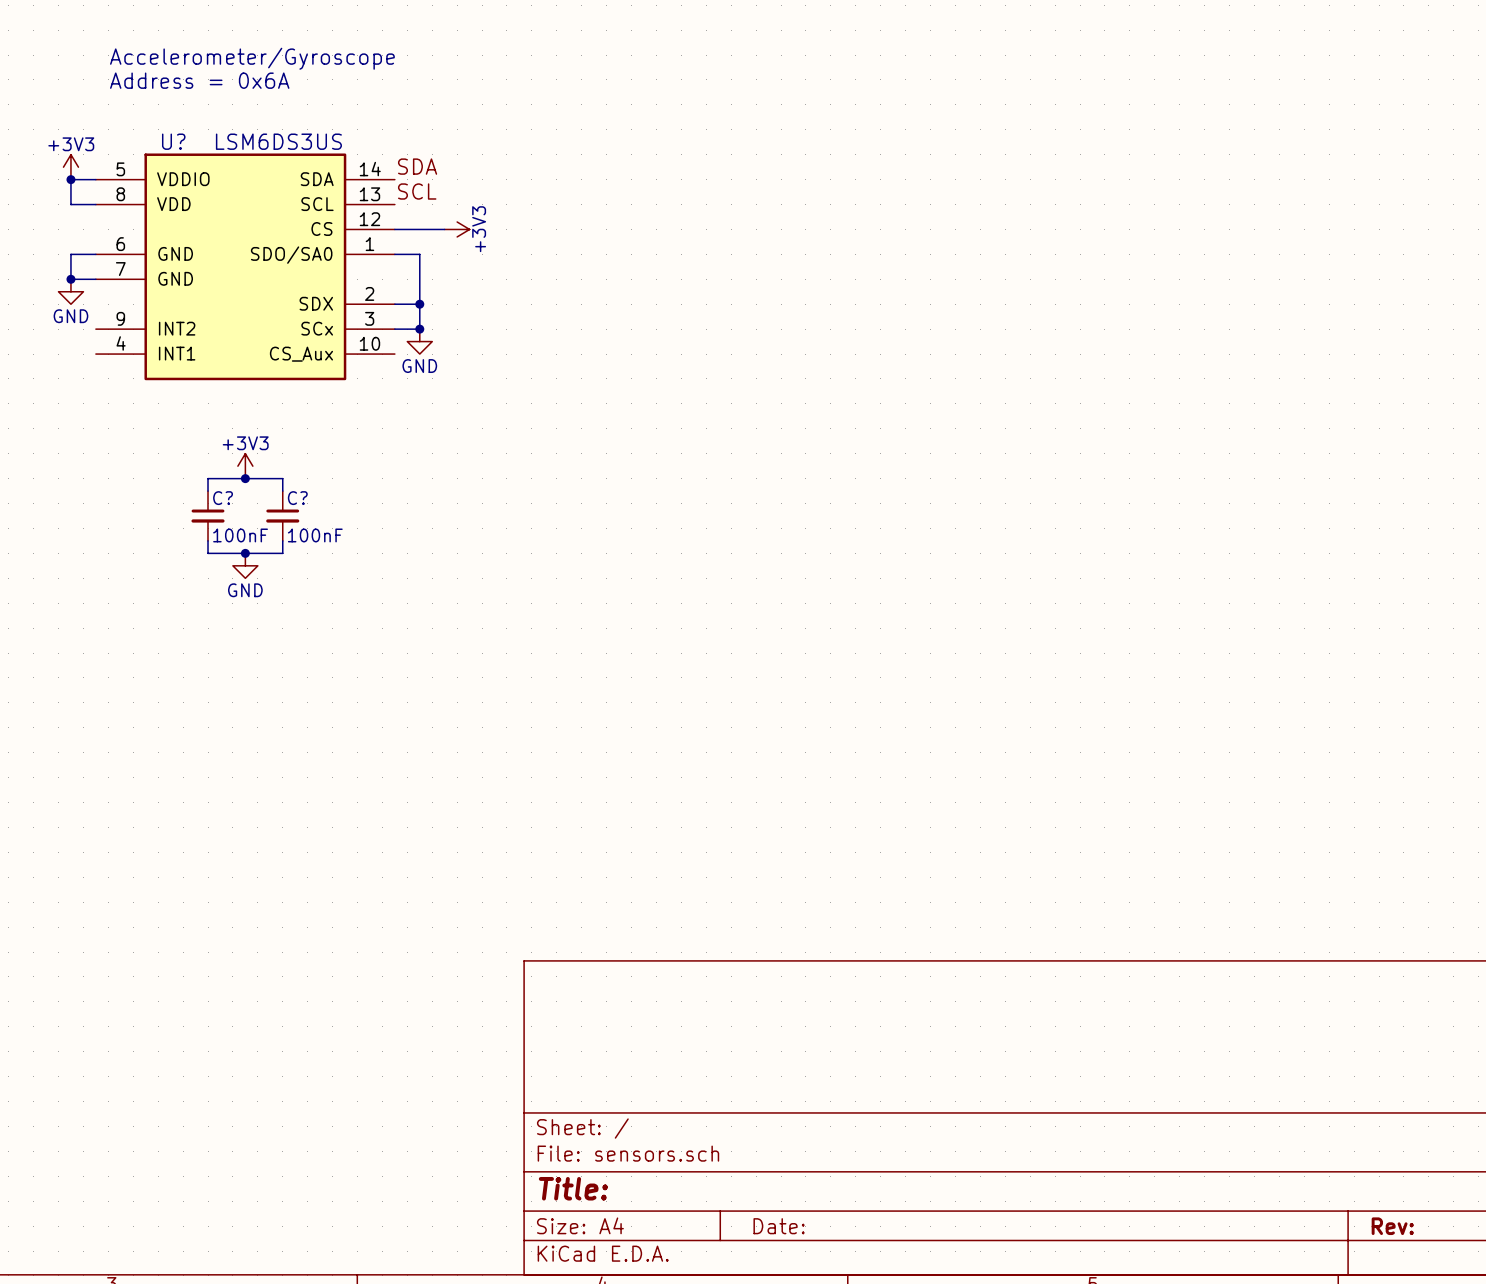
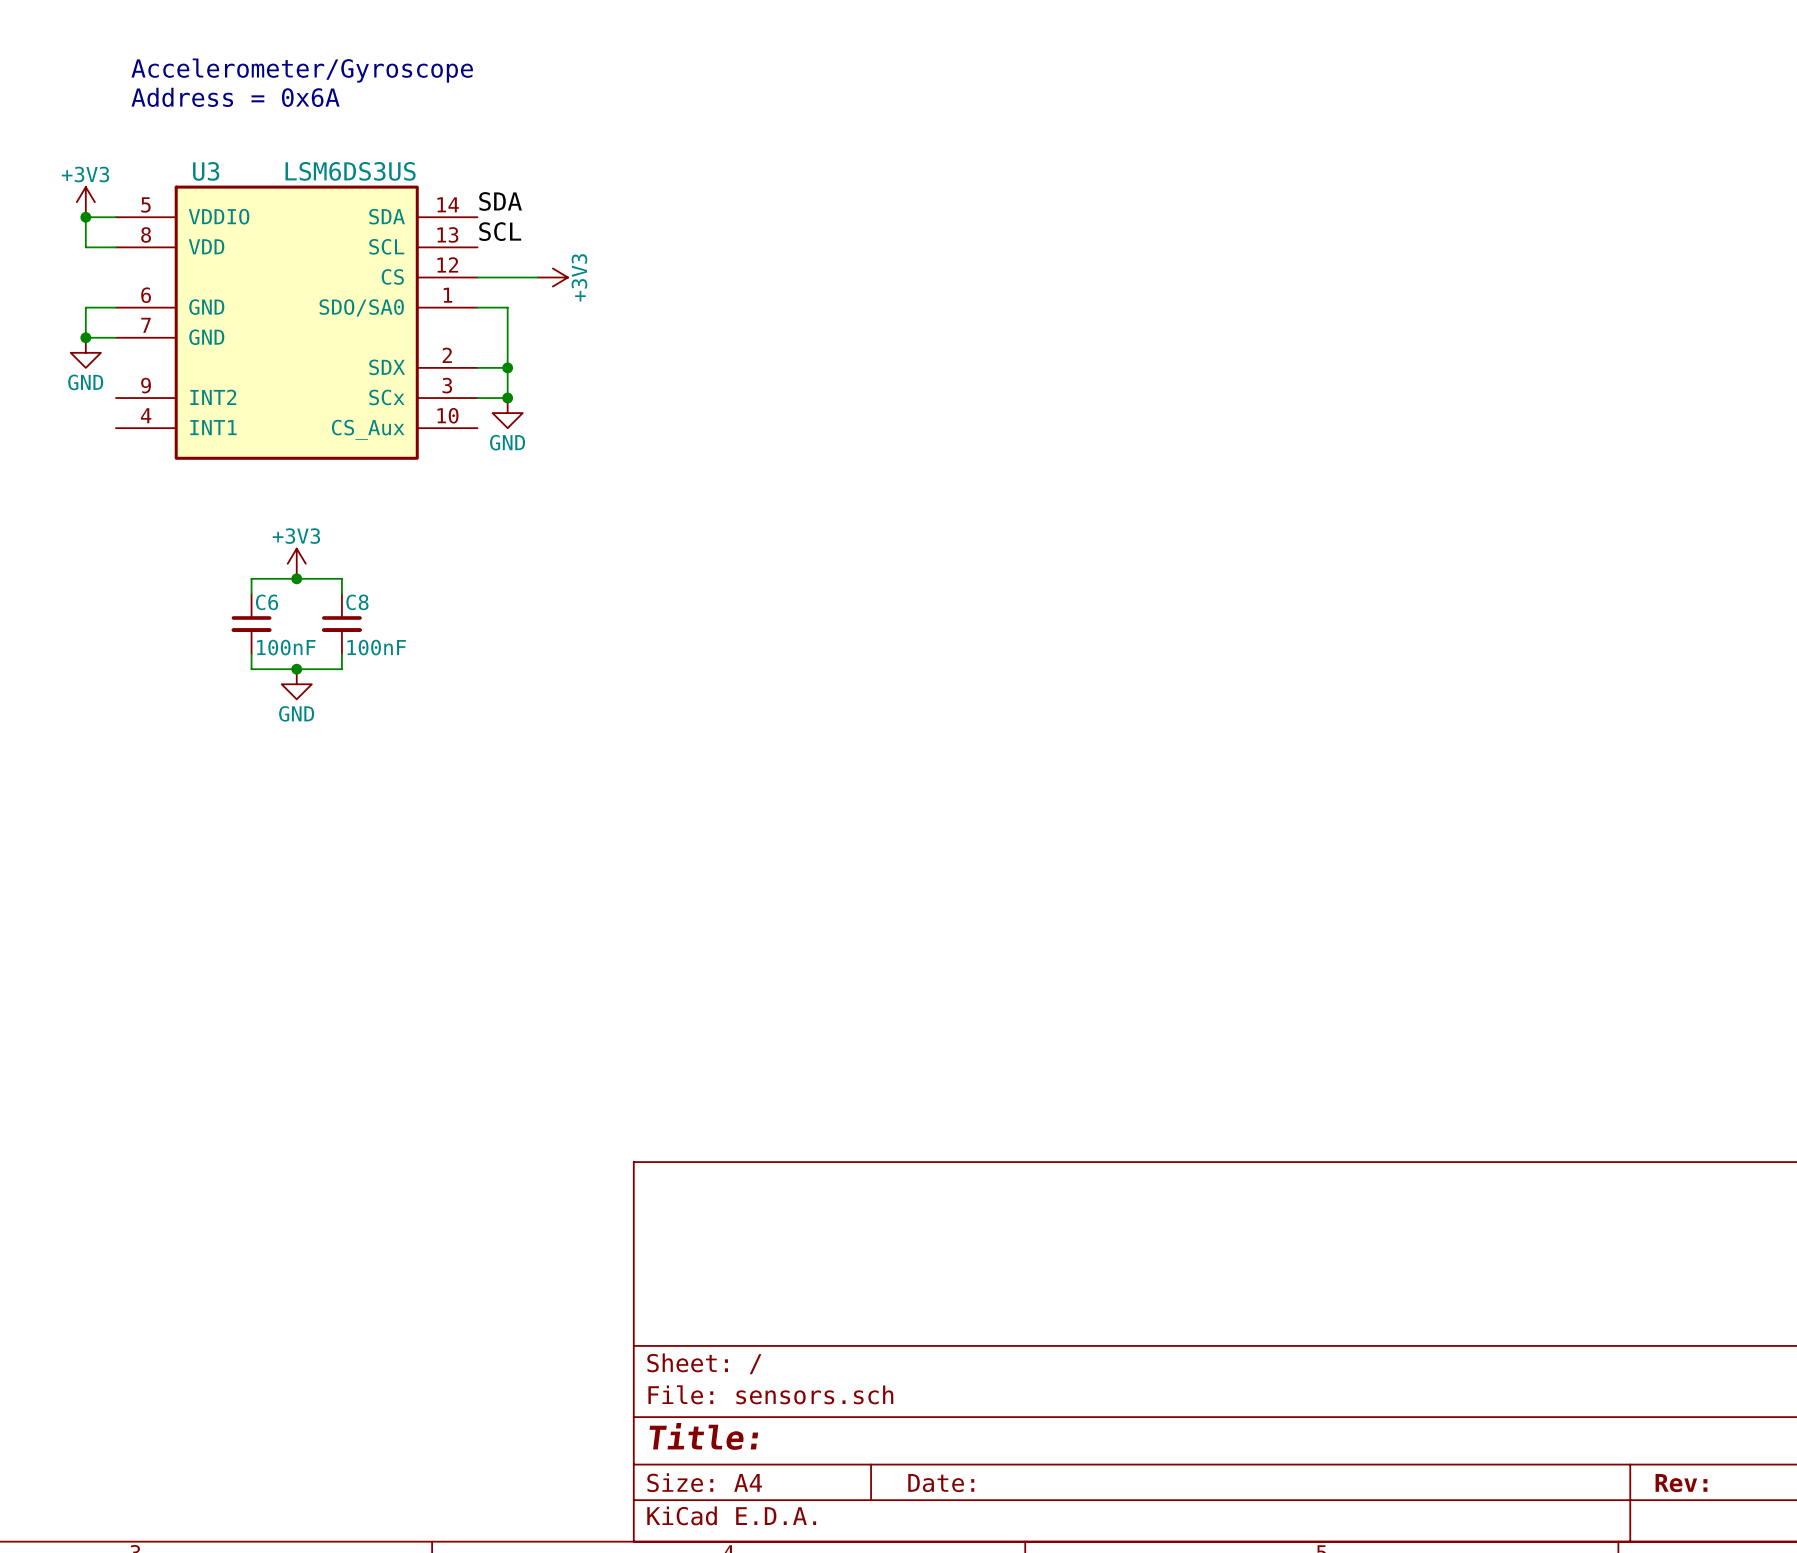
U? name: U? (173, 141) -> U3 (206, 171)
C? name: C? (223, 498) -> C6 (267, 602)
C? name: C? (297, 498) -> C8 (357, 602)

